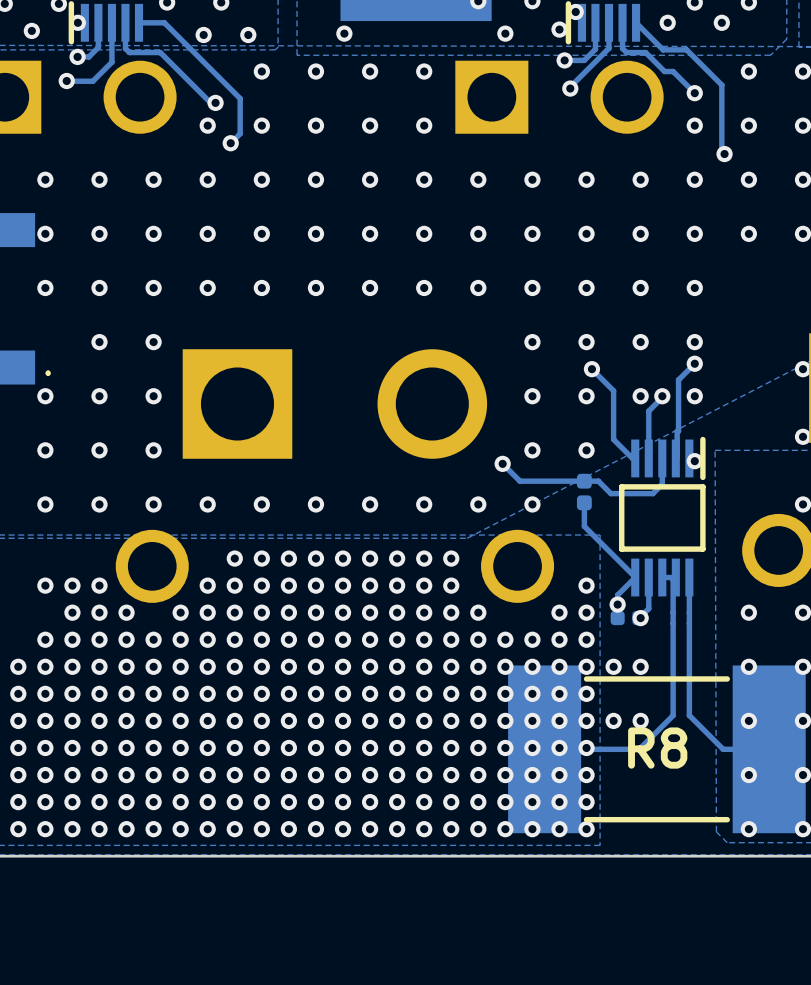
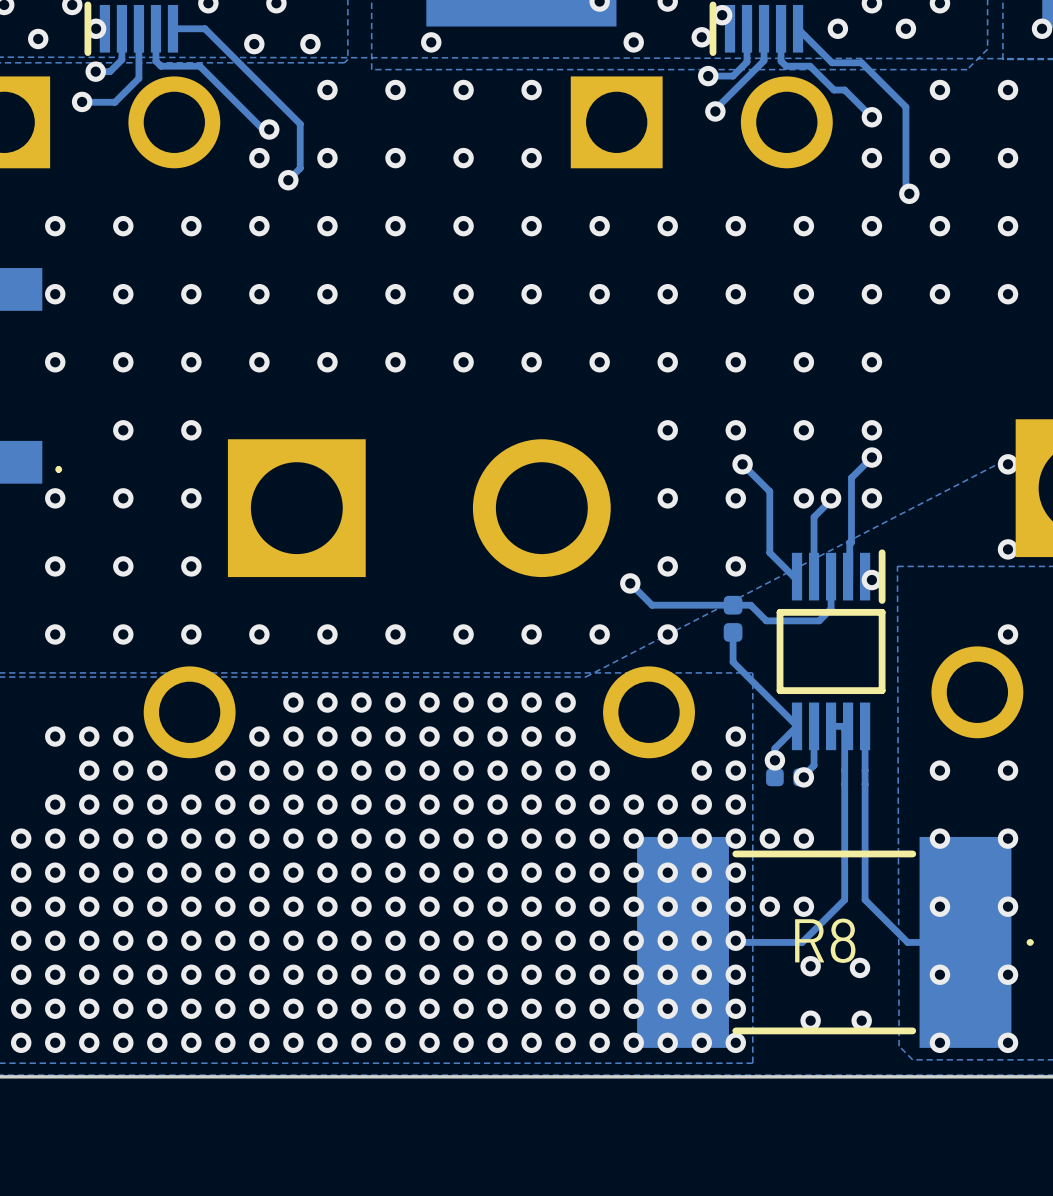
via: none -> (810, 966)
via: none -> (859, 967)
via: none -> (810, 1020)
via: none -> (861, 1020)

